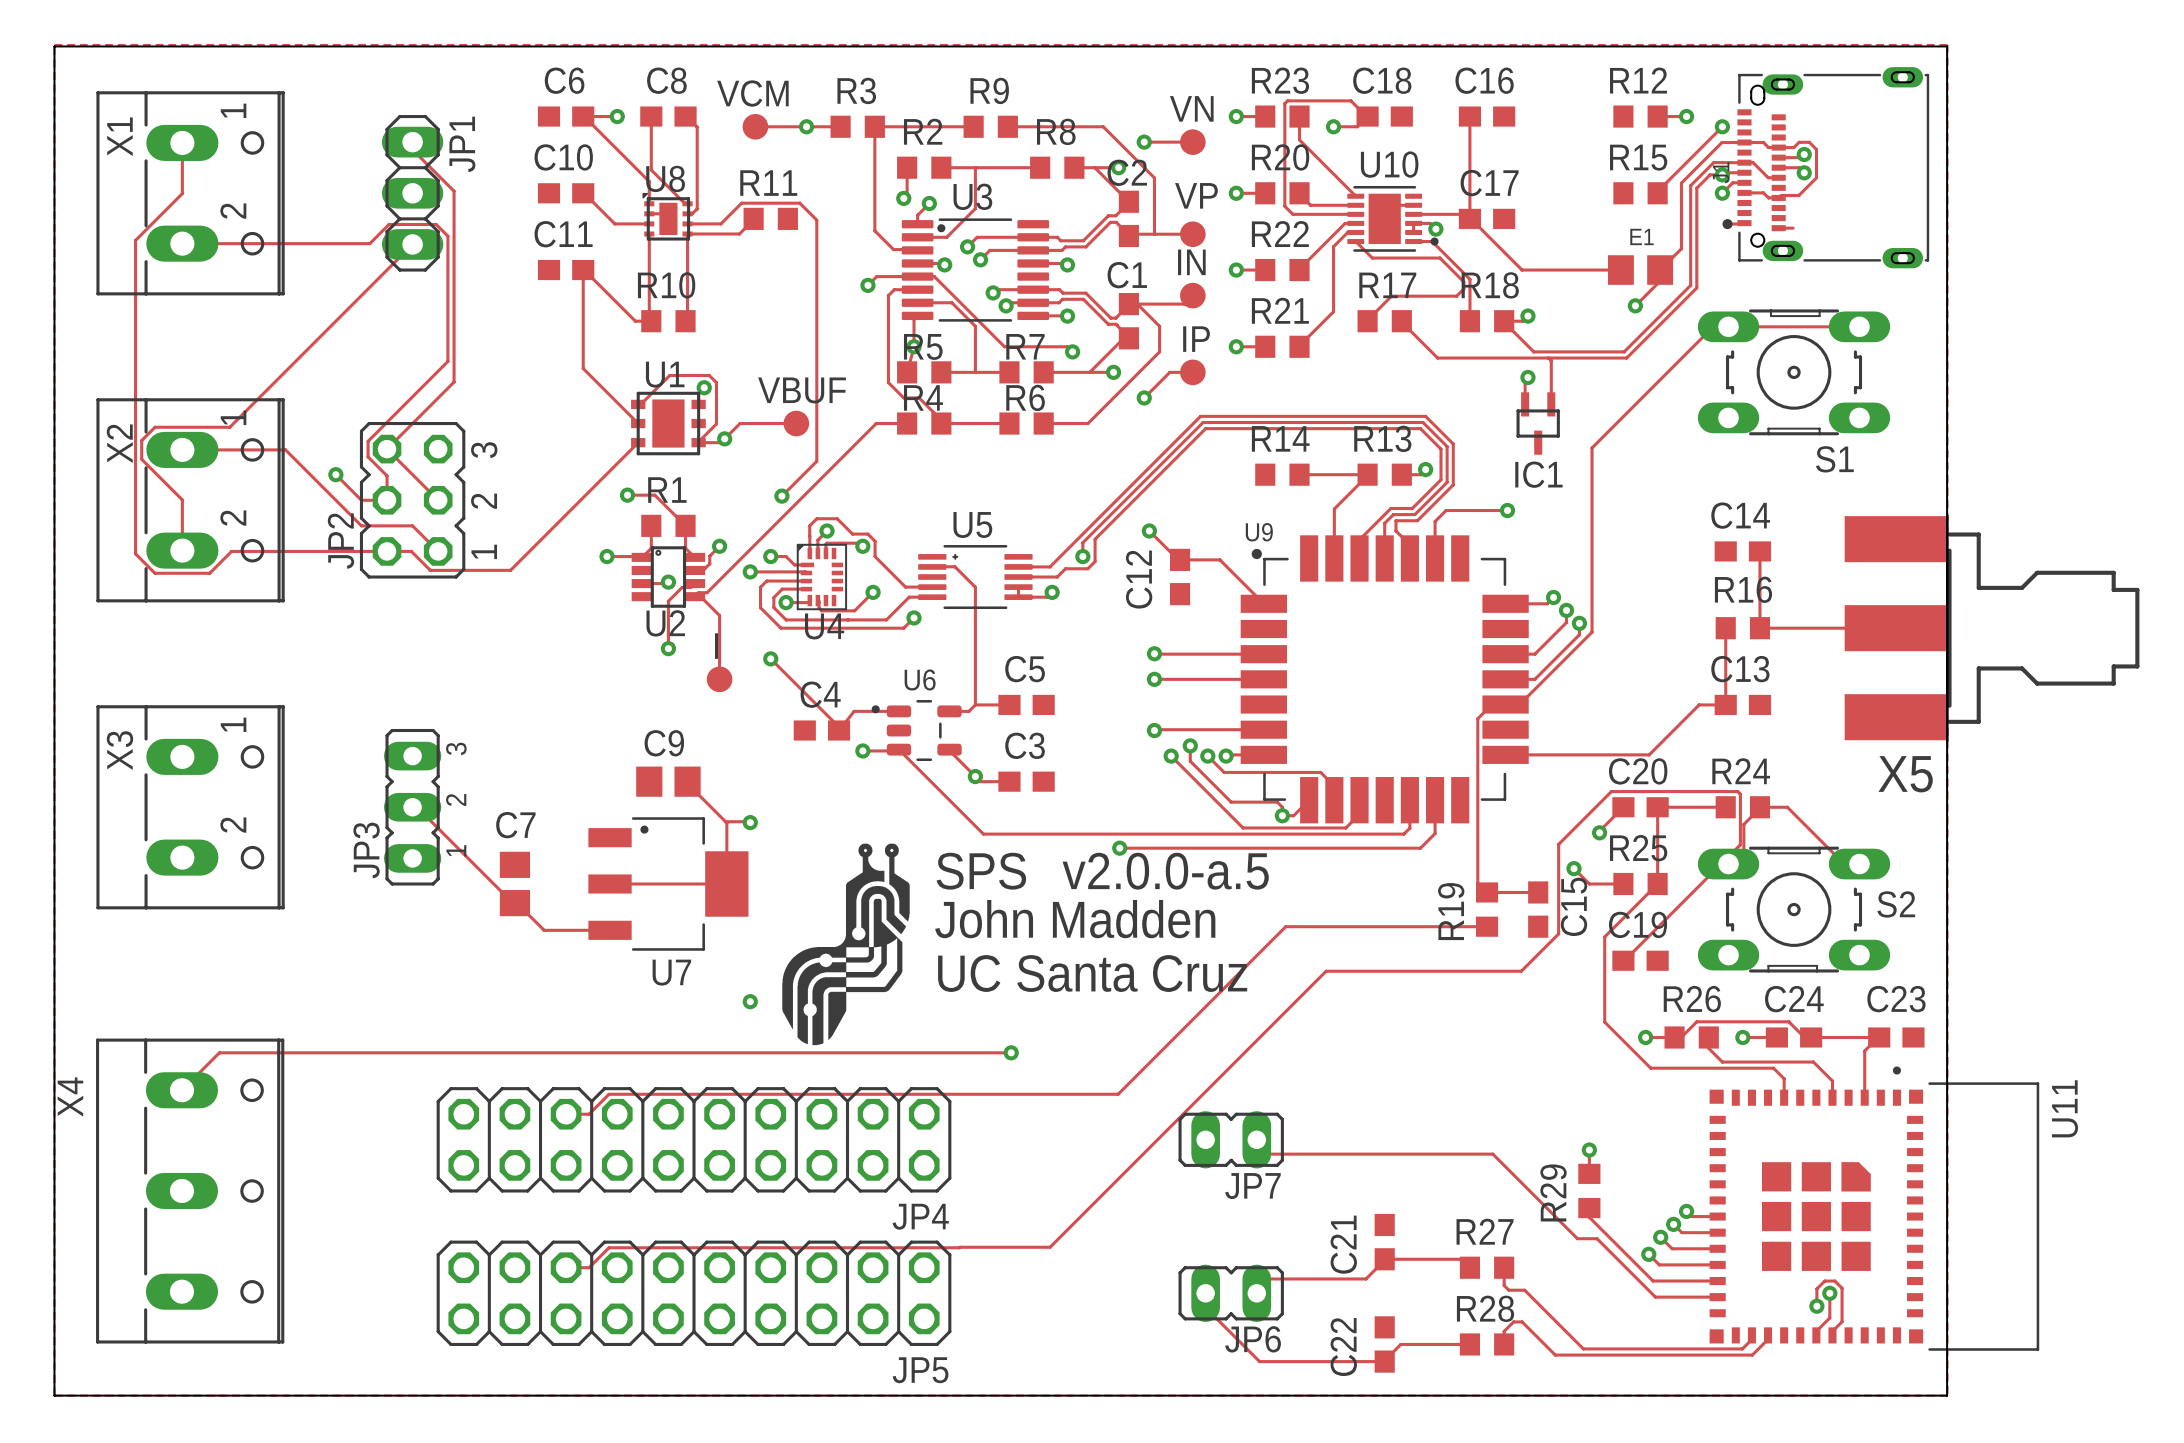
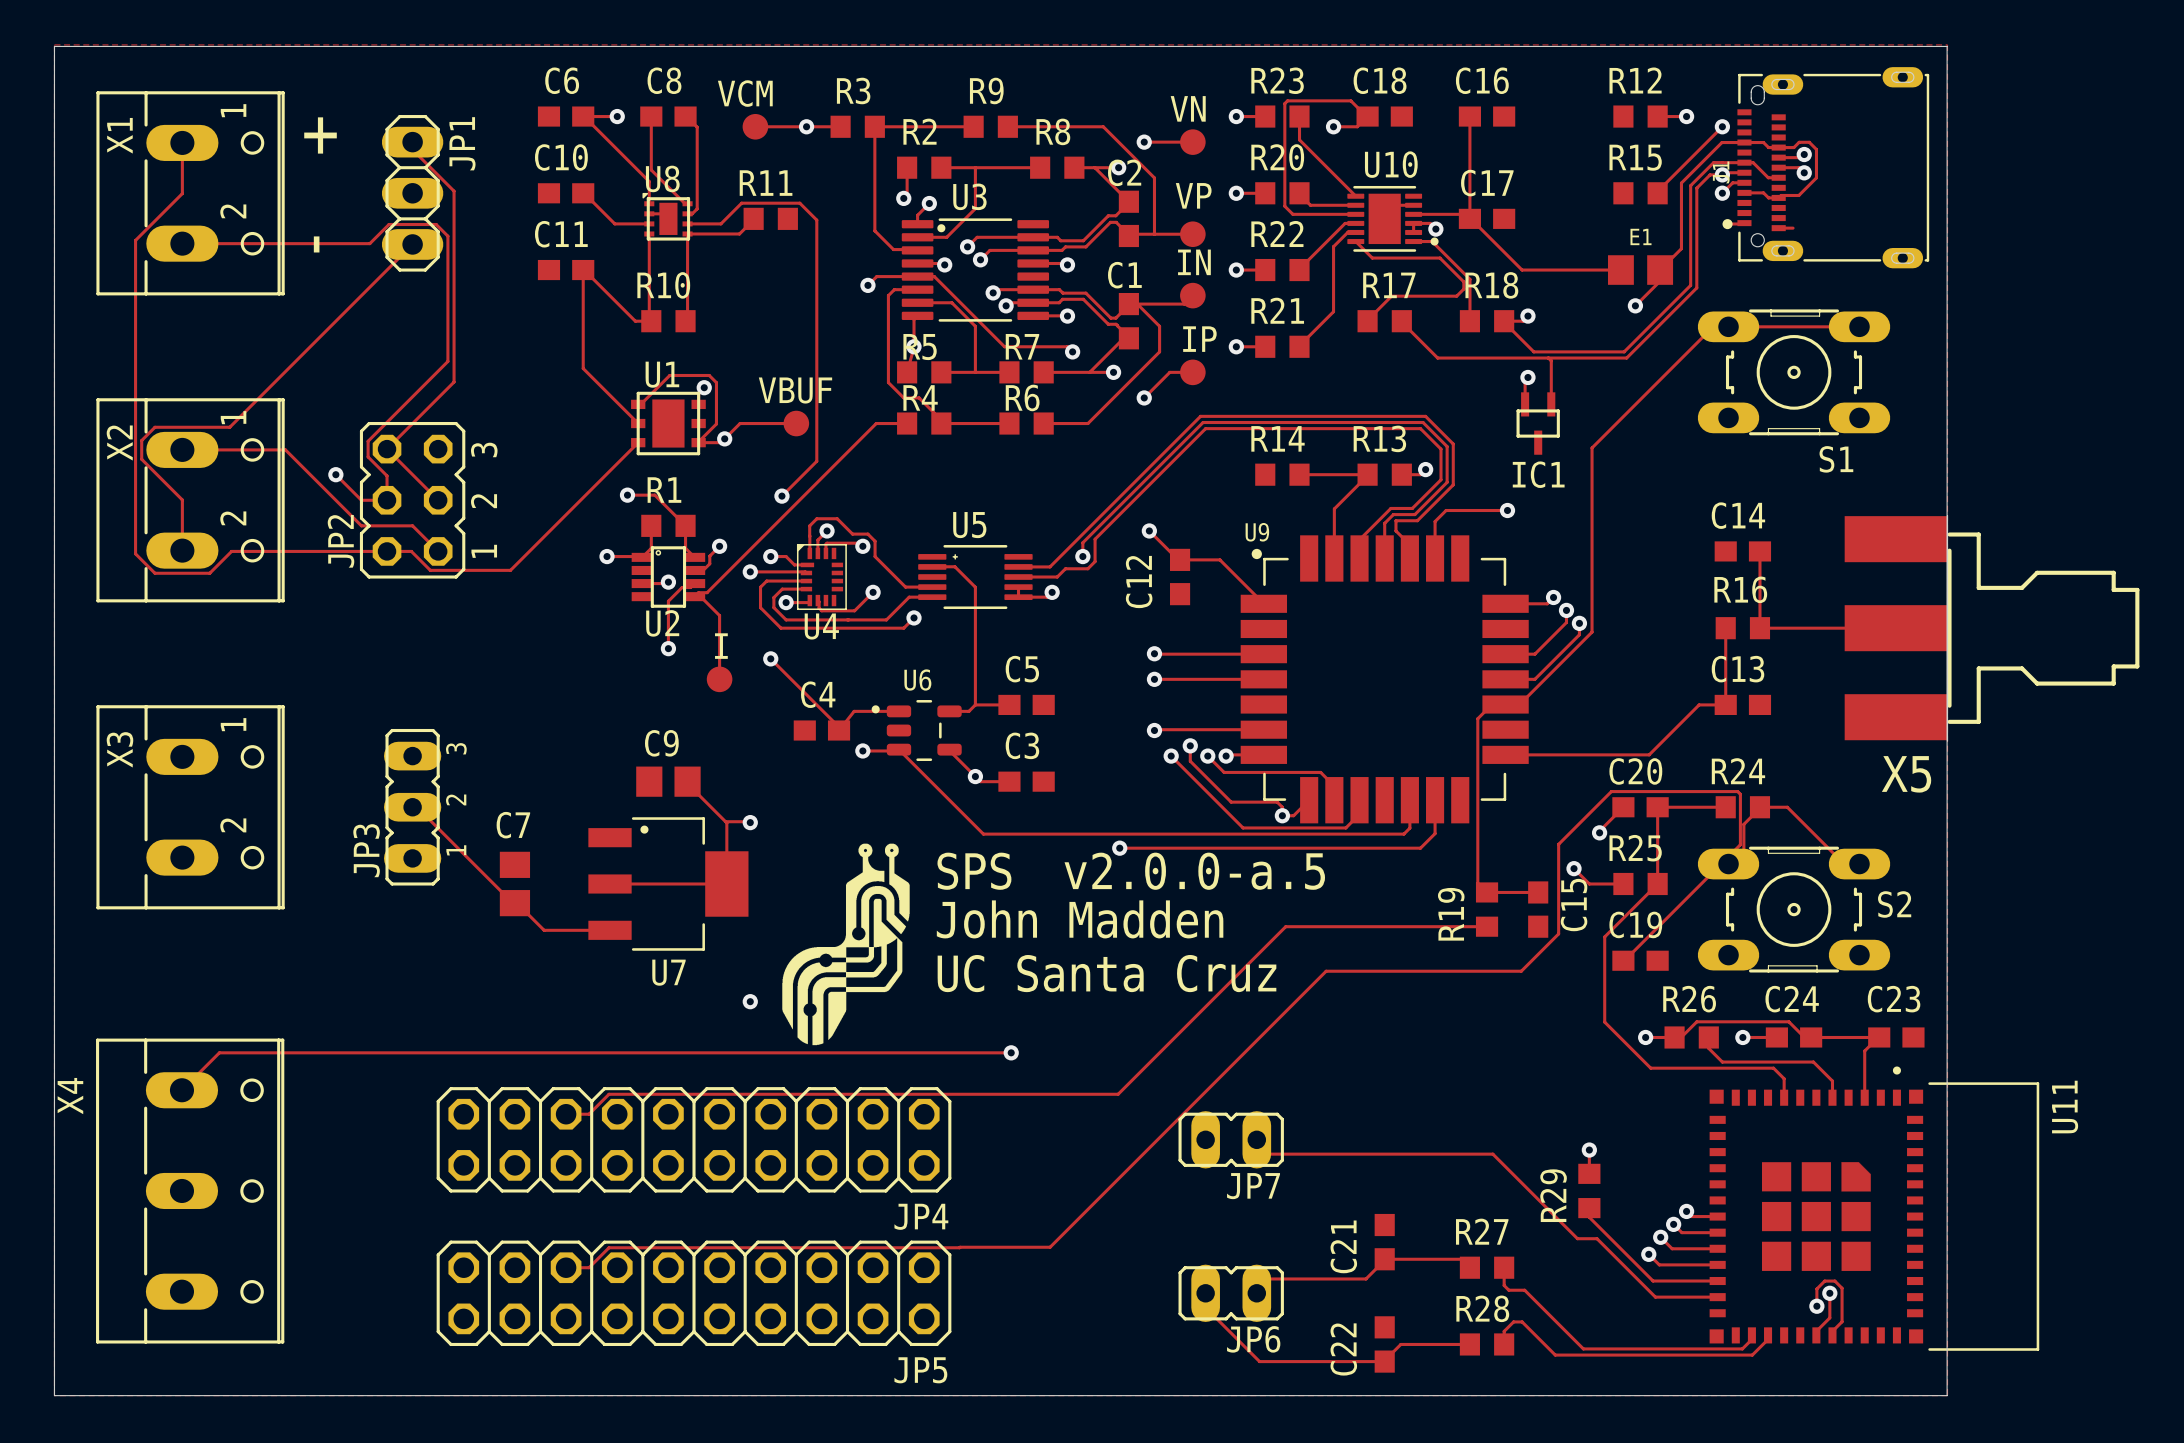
text: none -> + (320, 135)
text: none -> - (316, 244)

